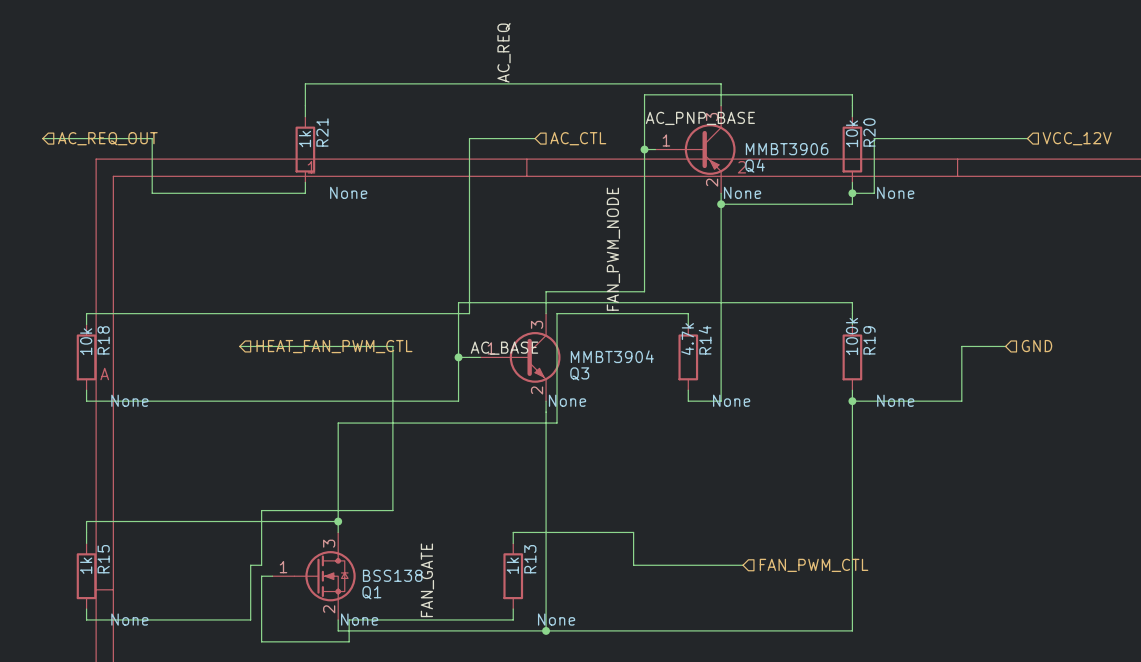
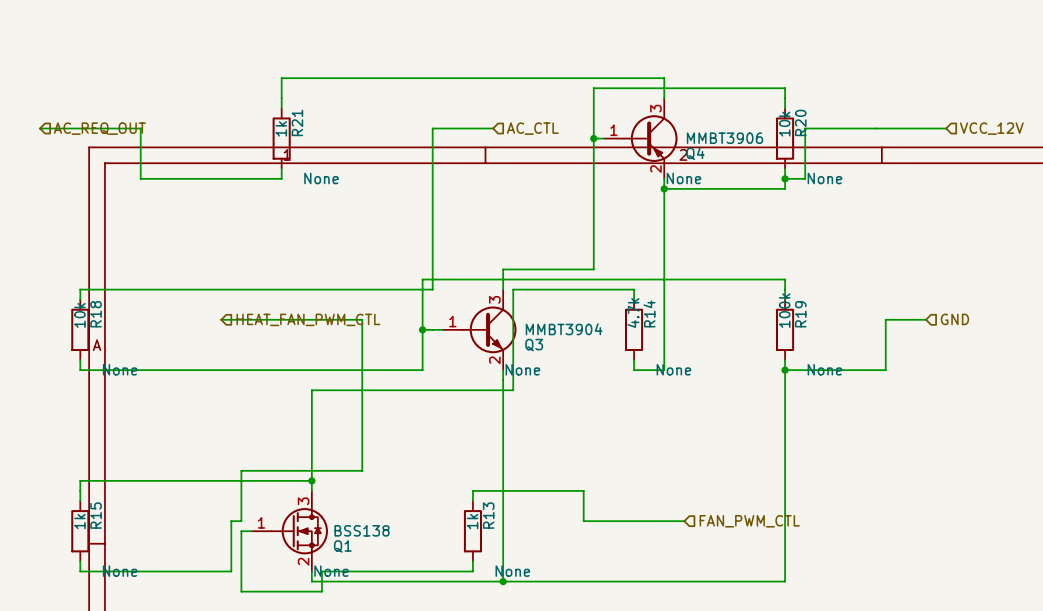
label: AC_REQ (504, 52) -> none
label: AC_PNP_BASE (700, 118) -> none
label: FAN_PWM_NODE (613, 249) -> none
label: AC_BASE (504, 348) -> none
label: FAN_GATE (427, 580) -> none

